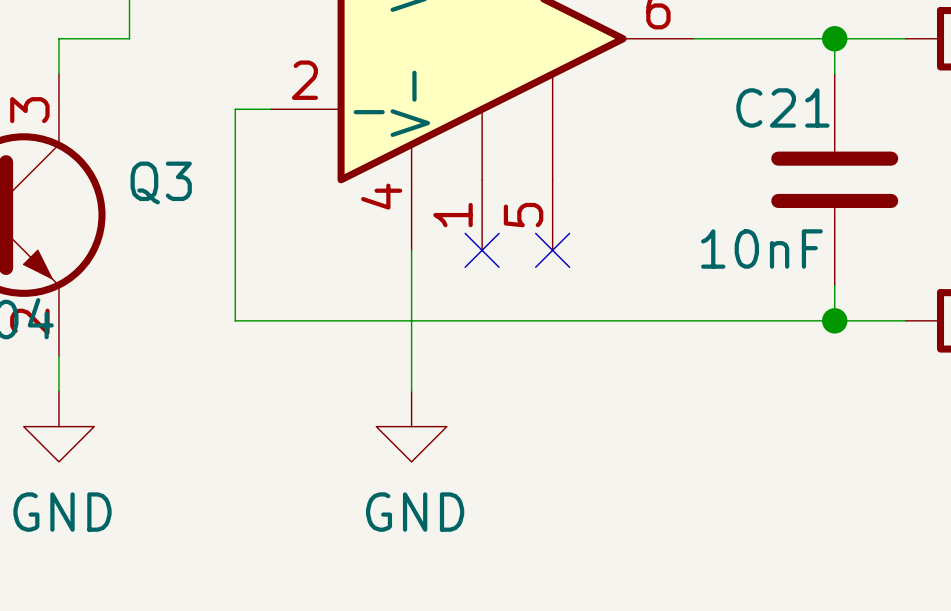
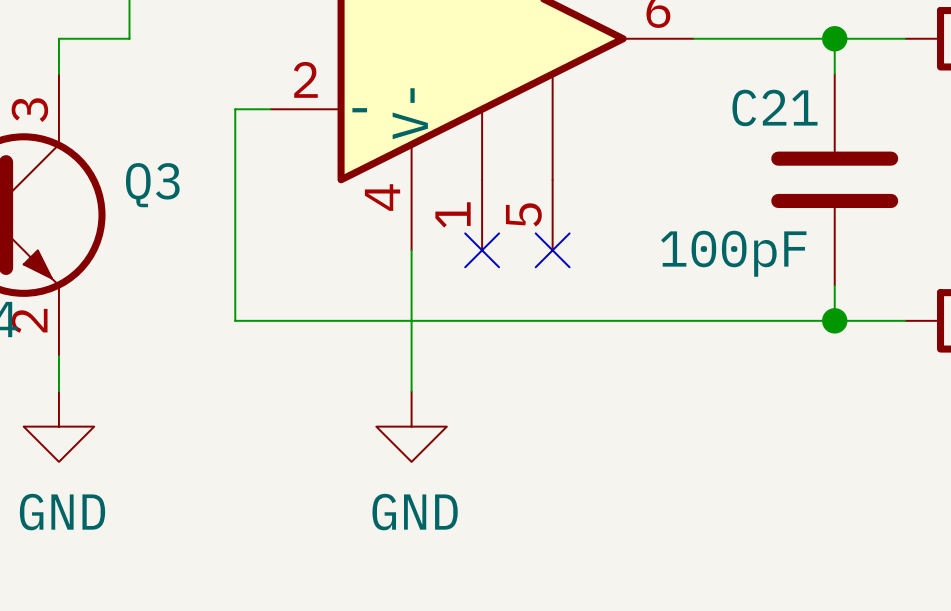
C21 value: 10nF (761, 249) -> 100pF (733, 253)

